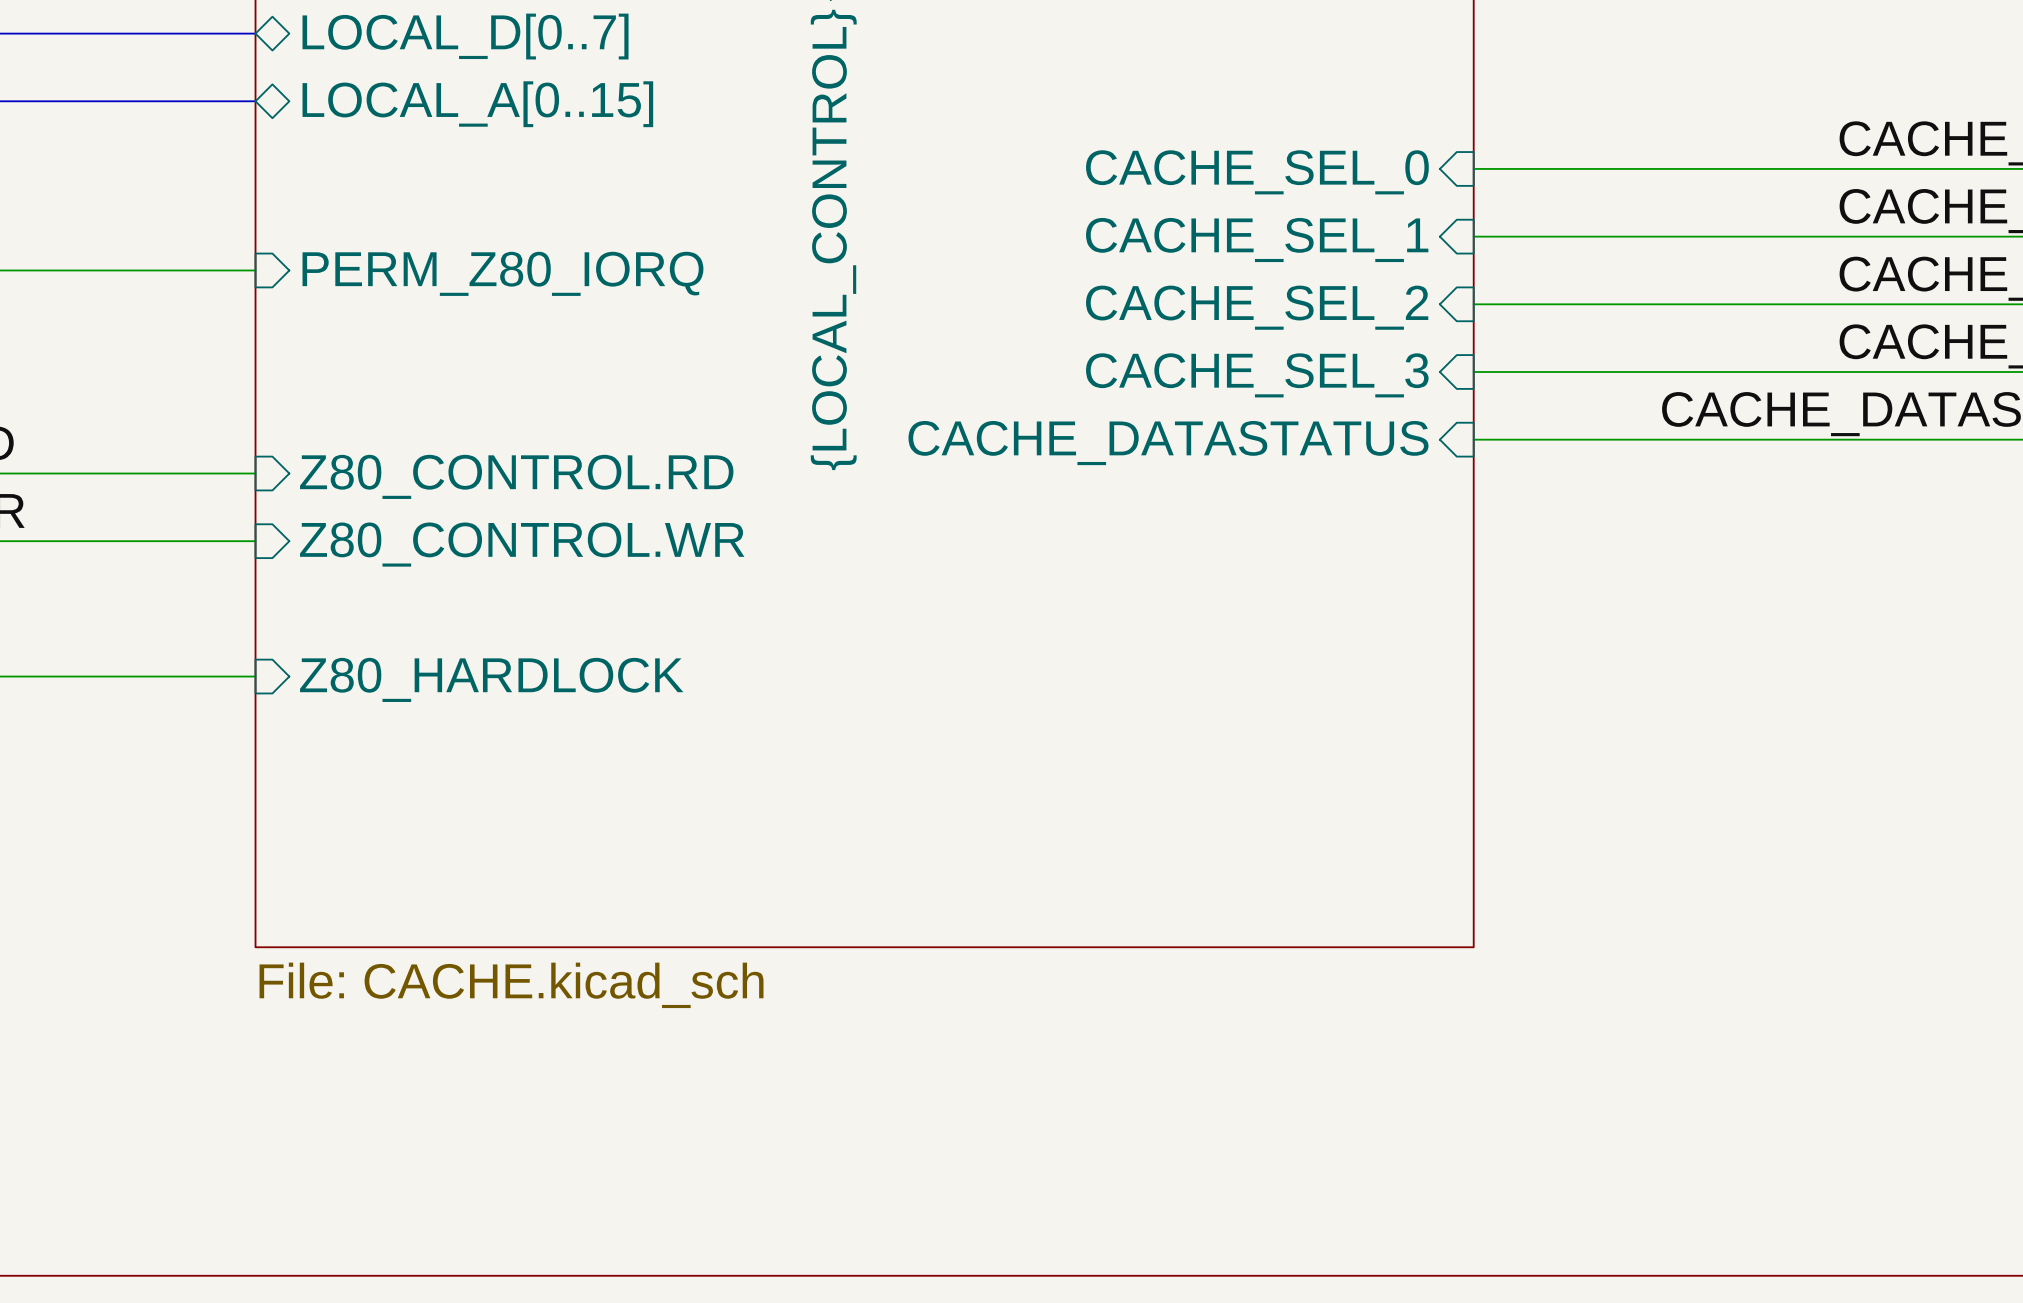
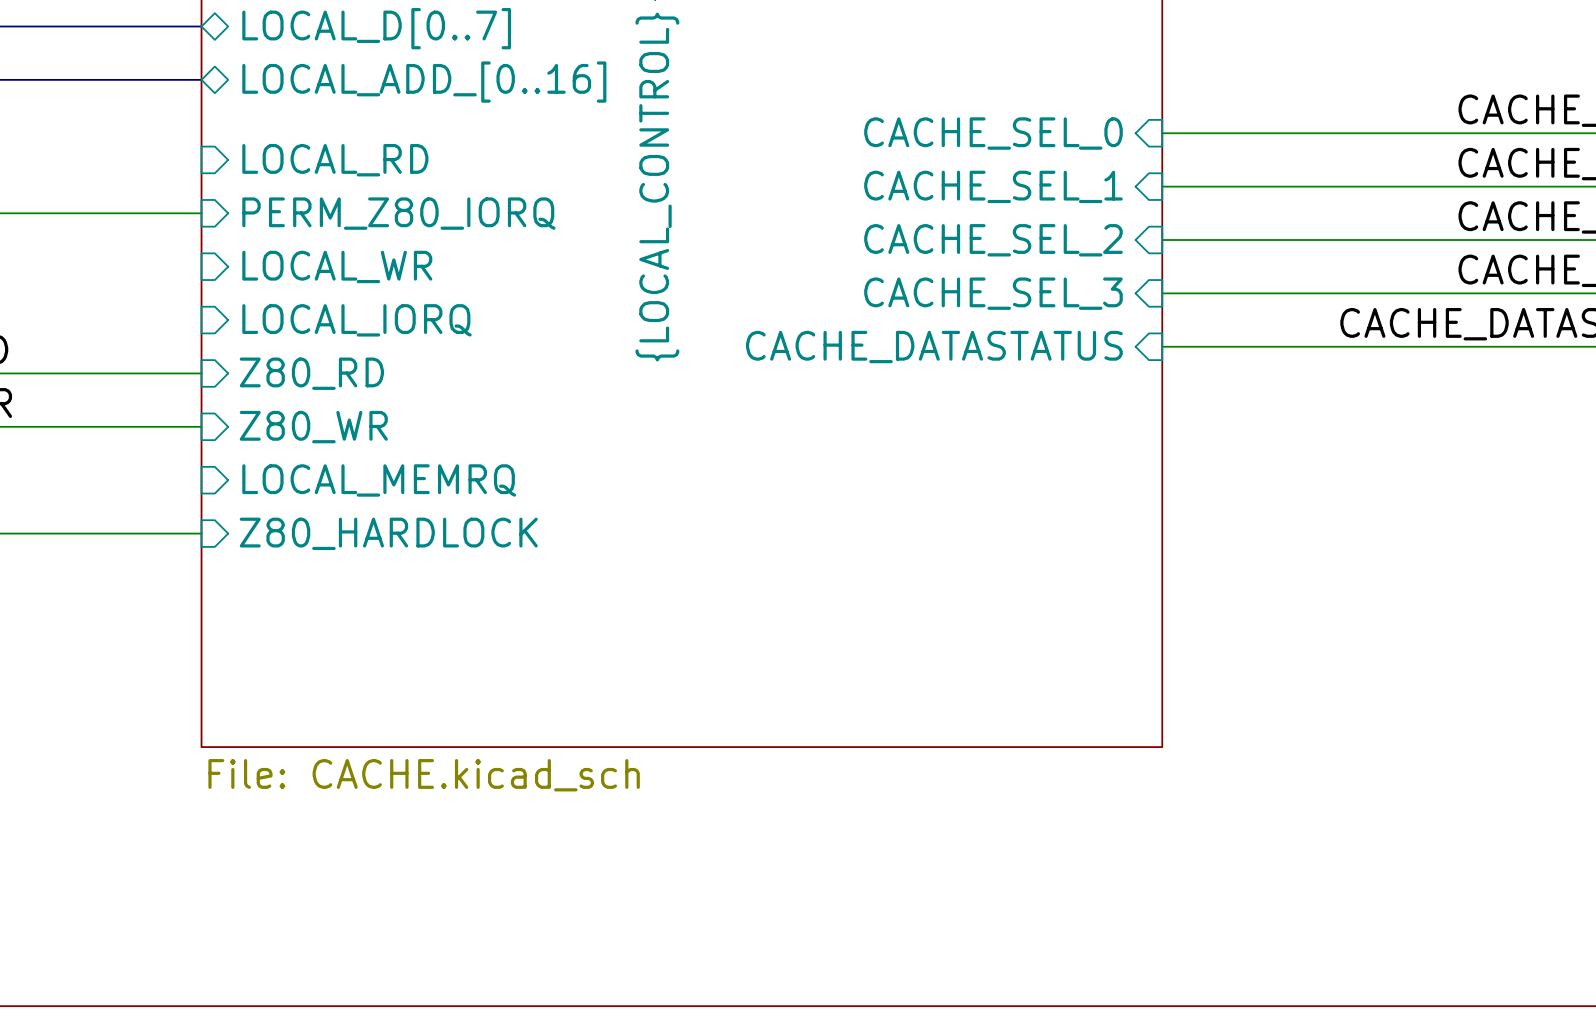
sheet pin: LOCAL_A[0..15] (477, 104) -> LOCAL_ADD_[0..16] (424, 82)
sheet pin: none -> LOCAL_RD (335, 160)
sheet pin: none -> LOCAL_WR (337, 266)
sheet pin: none -> LOCAL_IORQ (356, 320)
sheet pin: Z80_CONTROL.RD (516, 476) -> Z80_RD (311, 373)
sheet pin: Z80_CONTROL.WR (522, 544) -> Z80_WR (313, 427)
sheet pin: none -> LOCAL_MEMRQ (379, 480)

